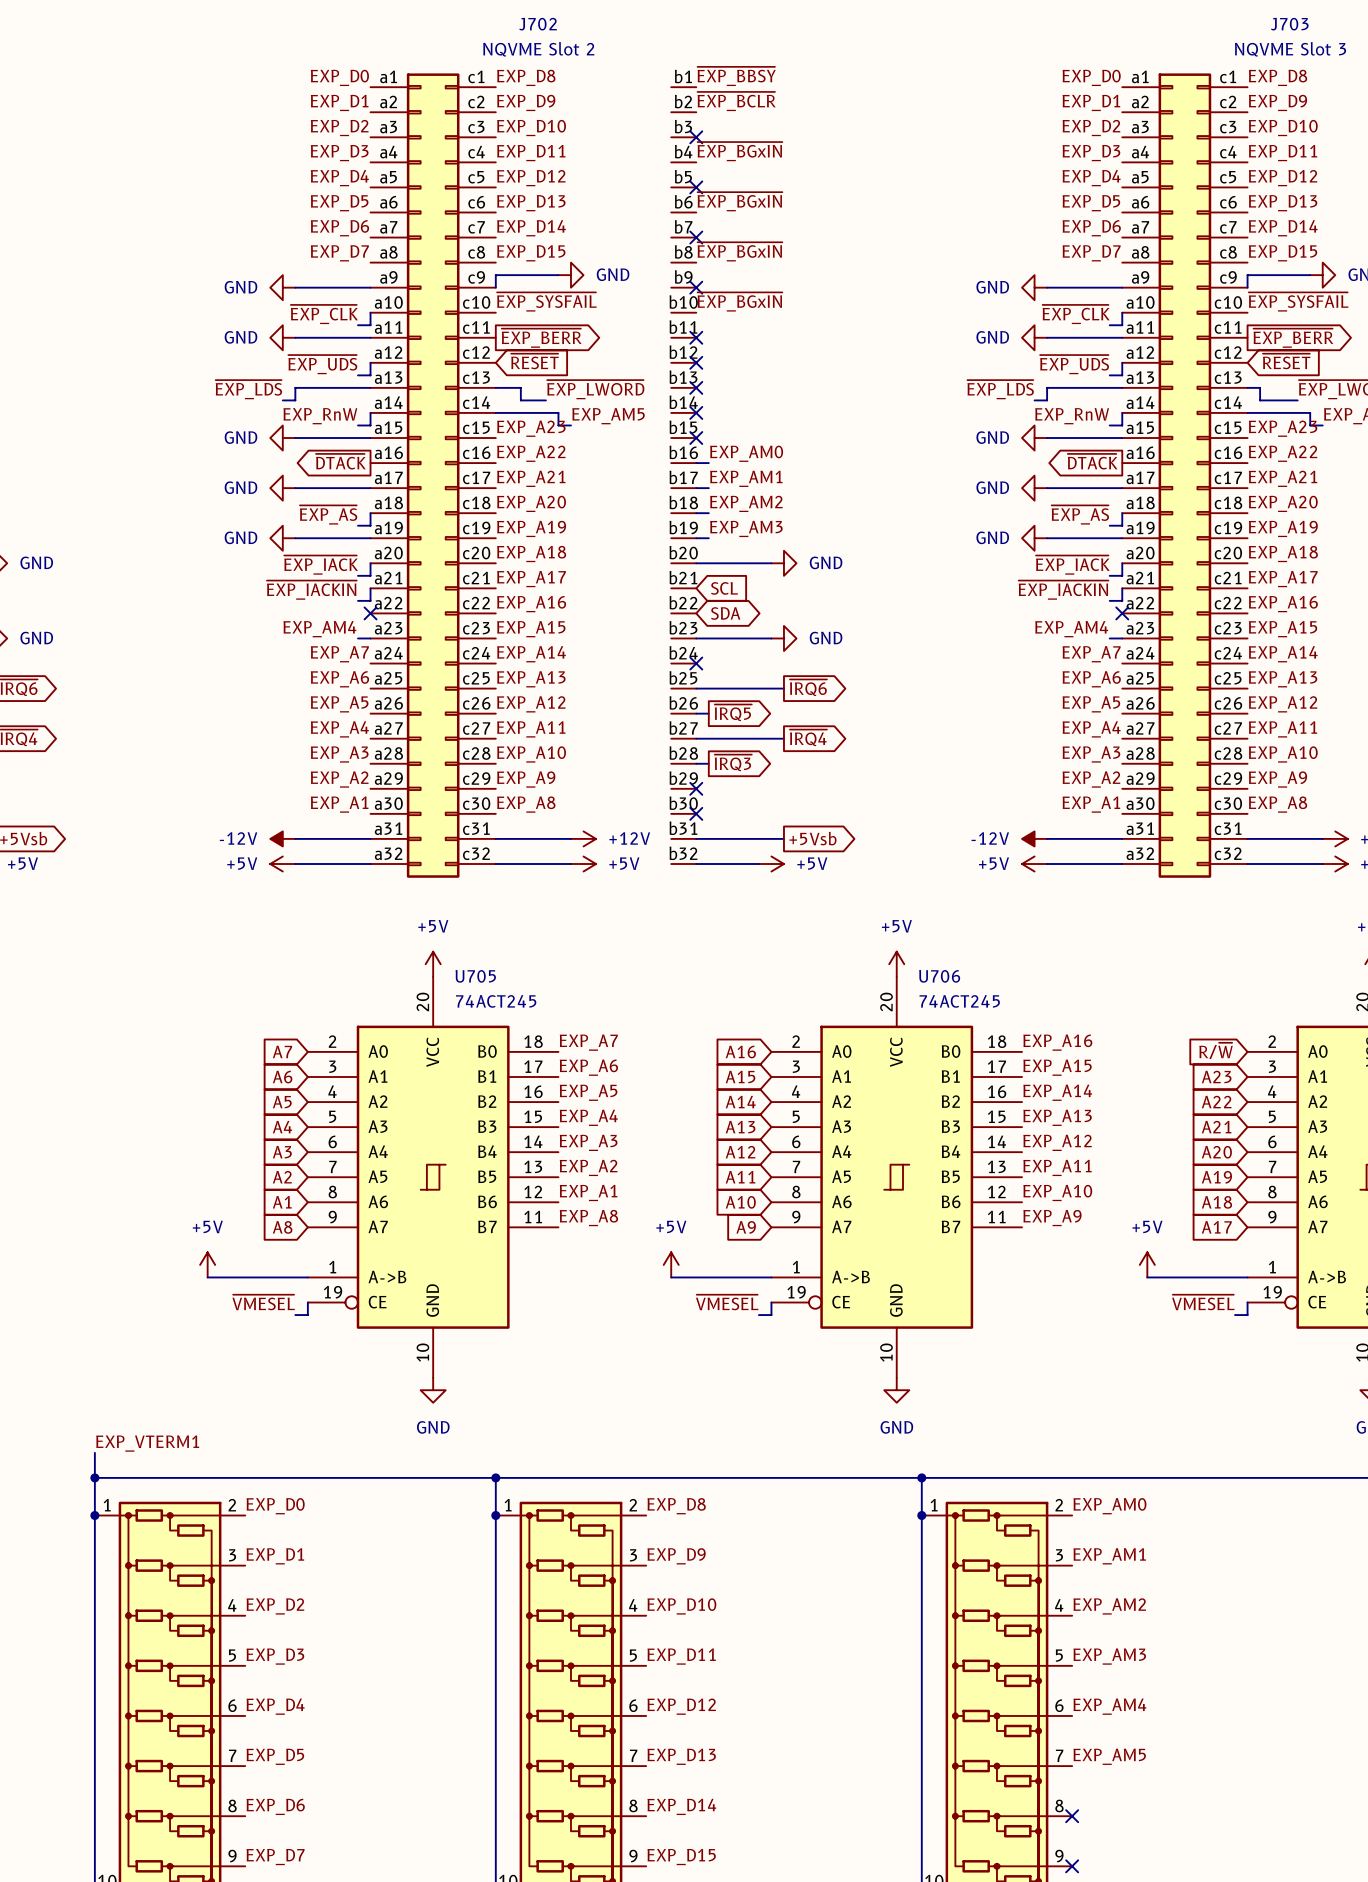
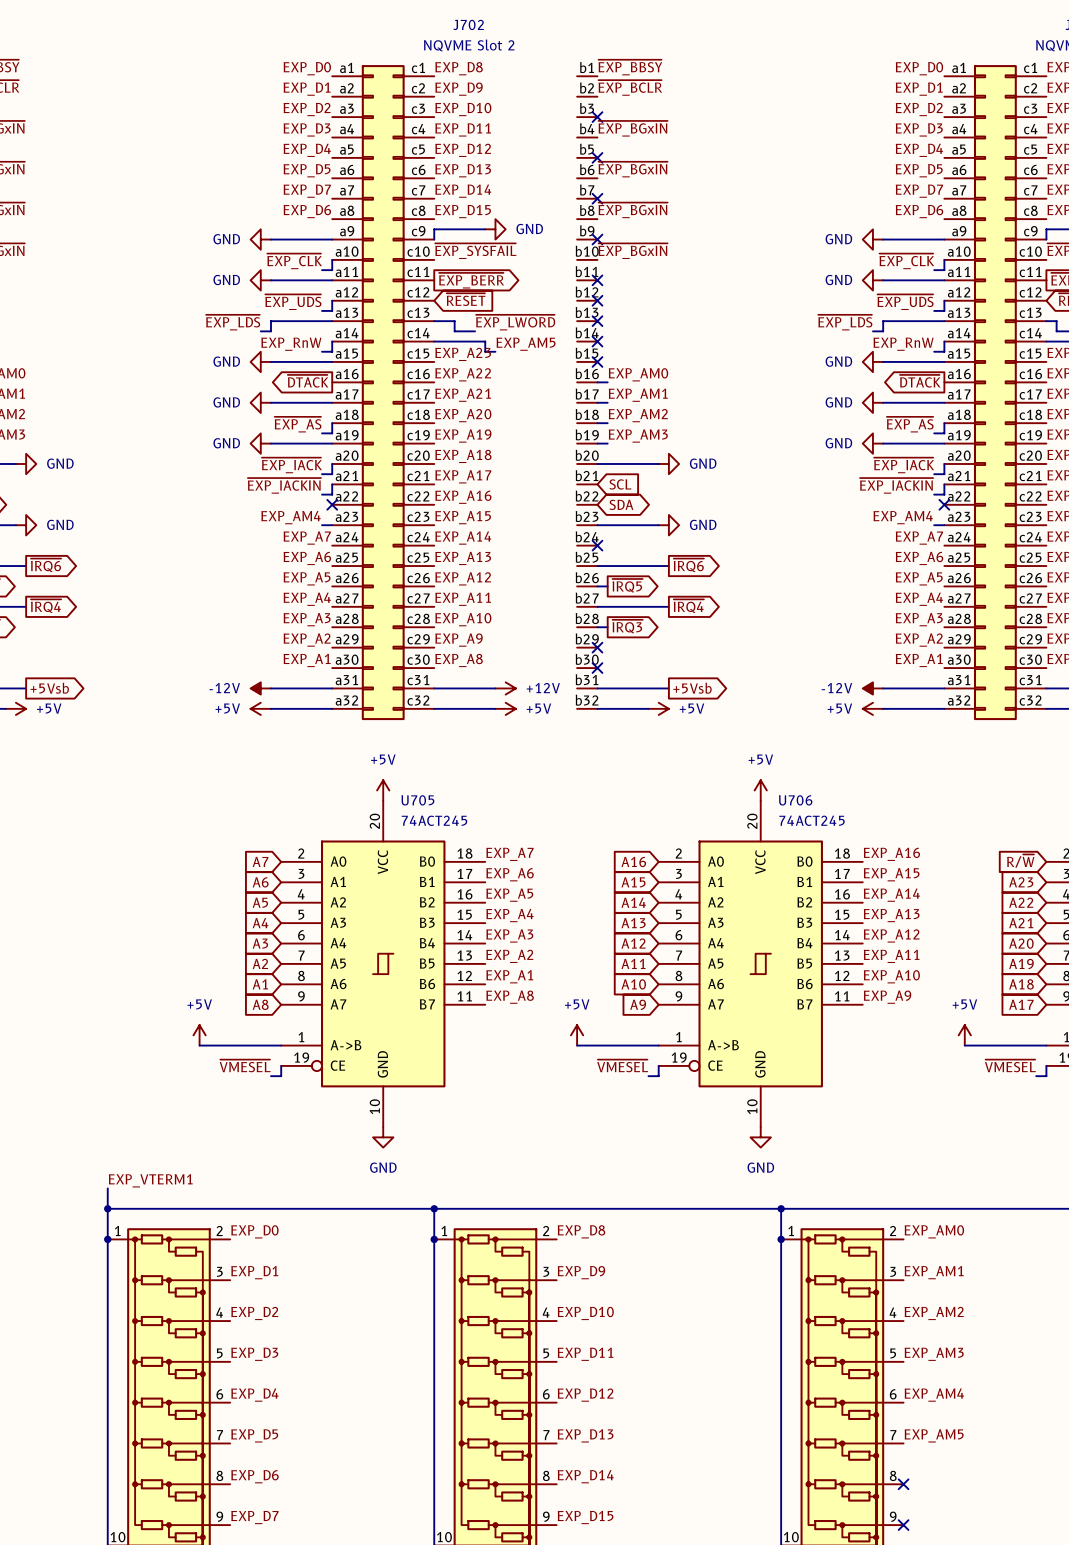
label: EXP_D6 (339, 228) -> EXP_D7 (307, 191)
label: EXP_D6 (1091, 228) -> EXP_D7 (919, 191)
label: EXP_D7 (339, 253) -> EXP_D6 (307, 211)
label: EXP_D7 (1091, 253) -> EXP_D6 (919, 211)

